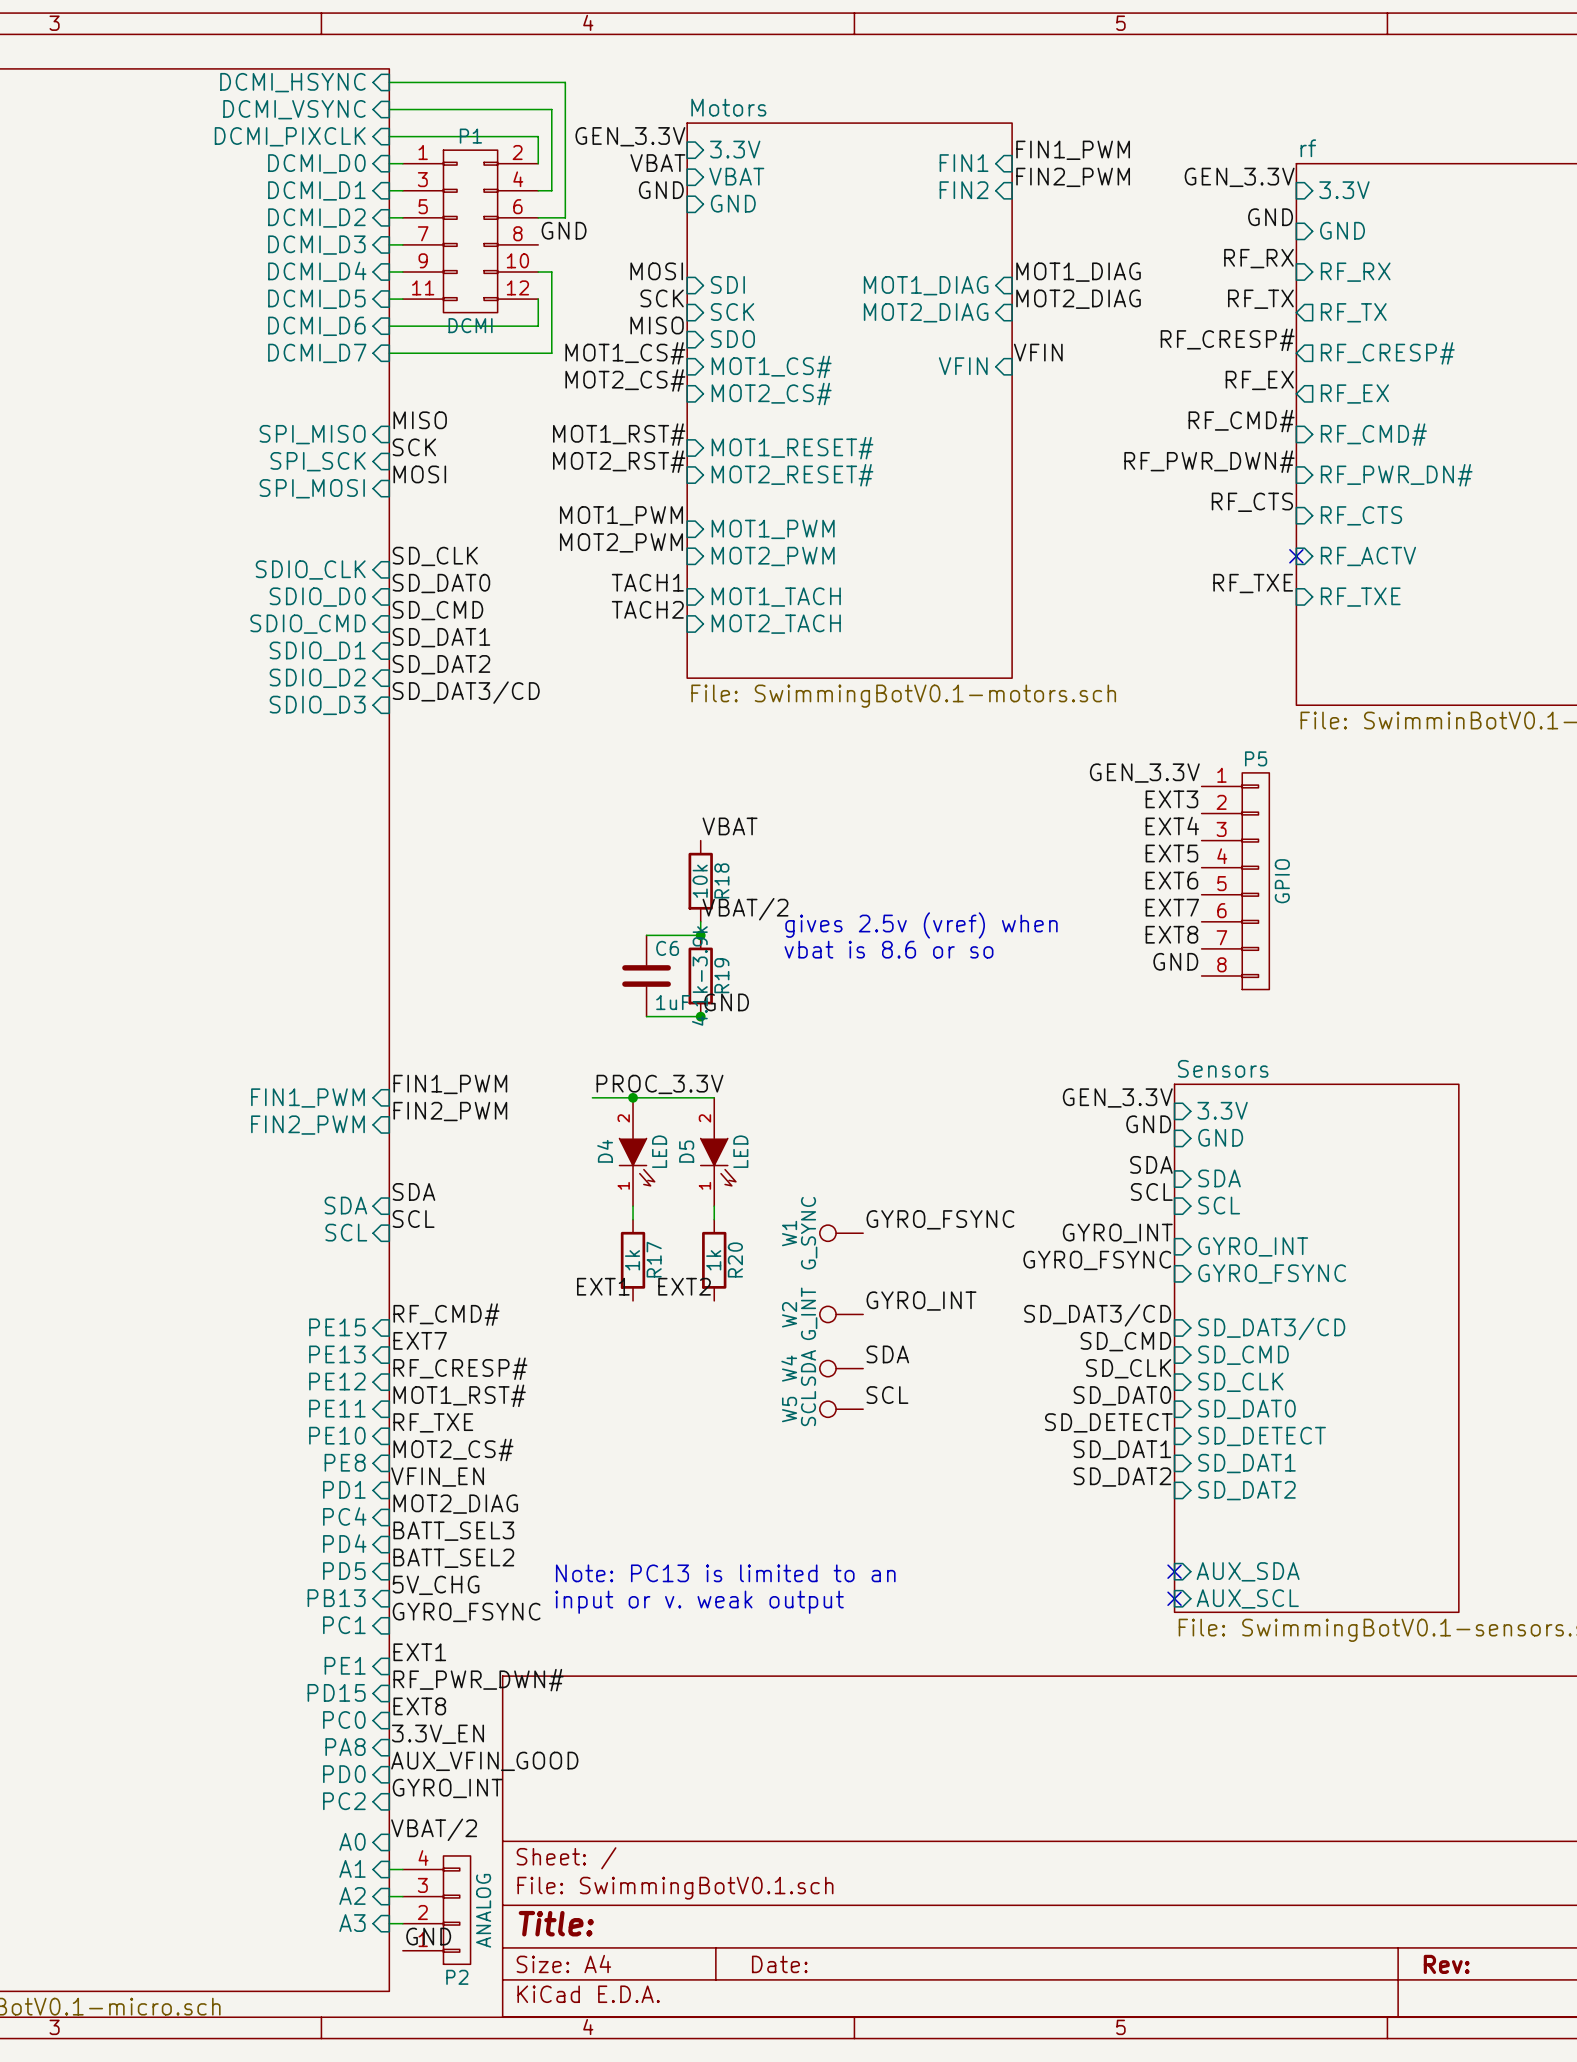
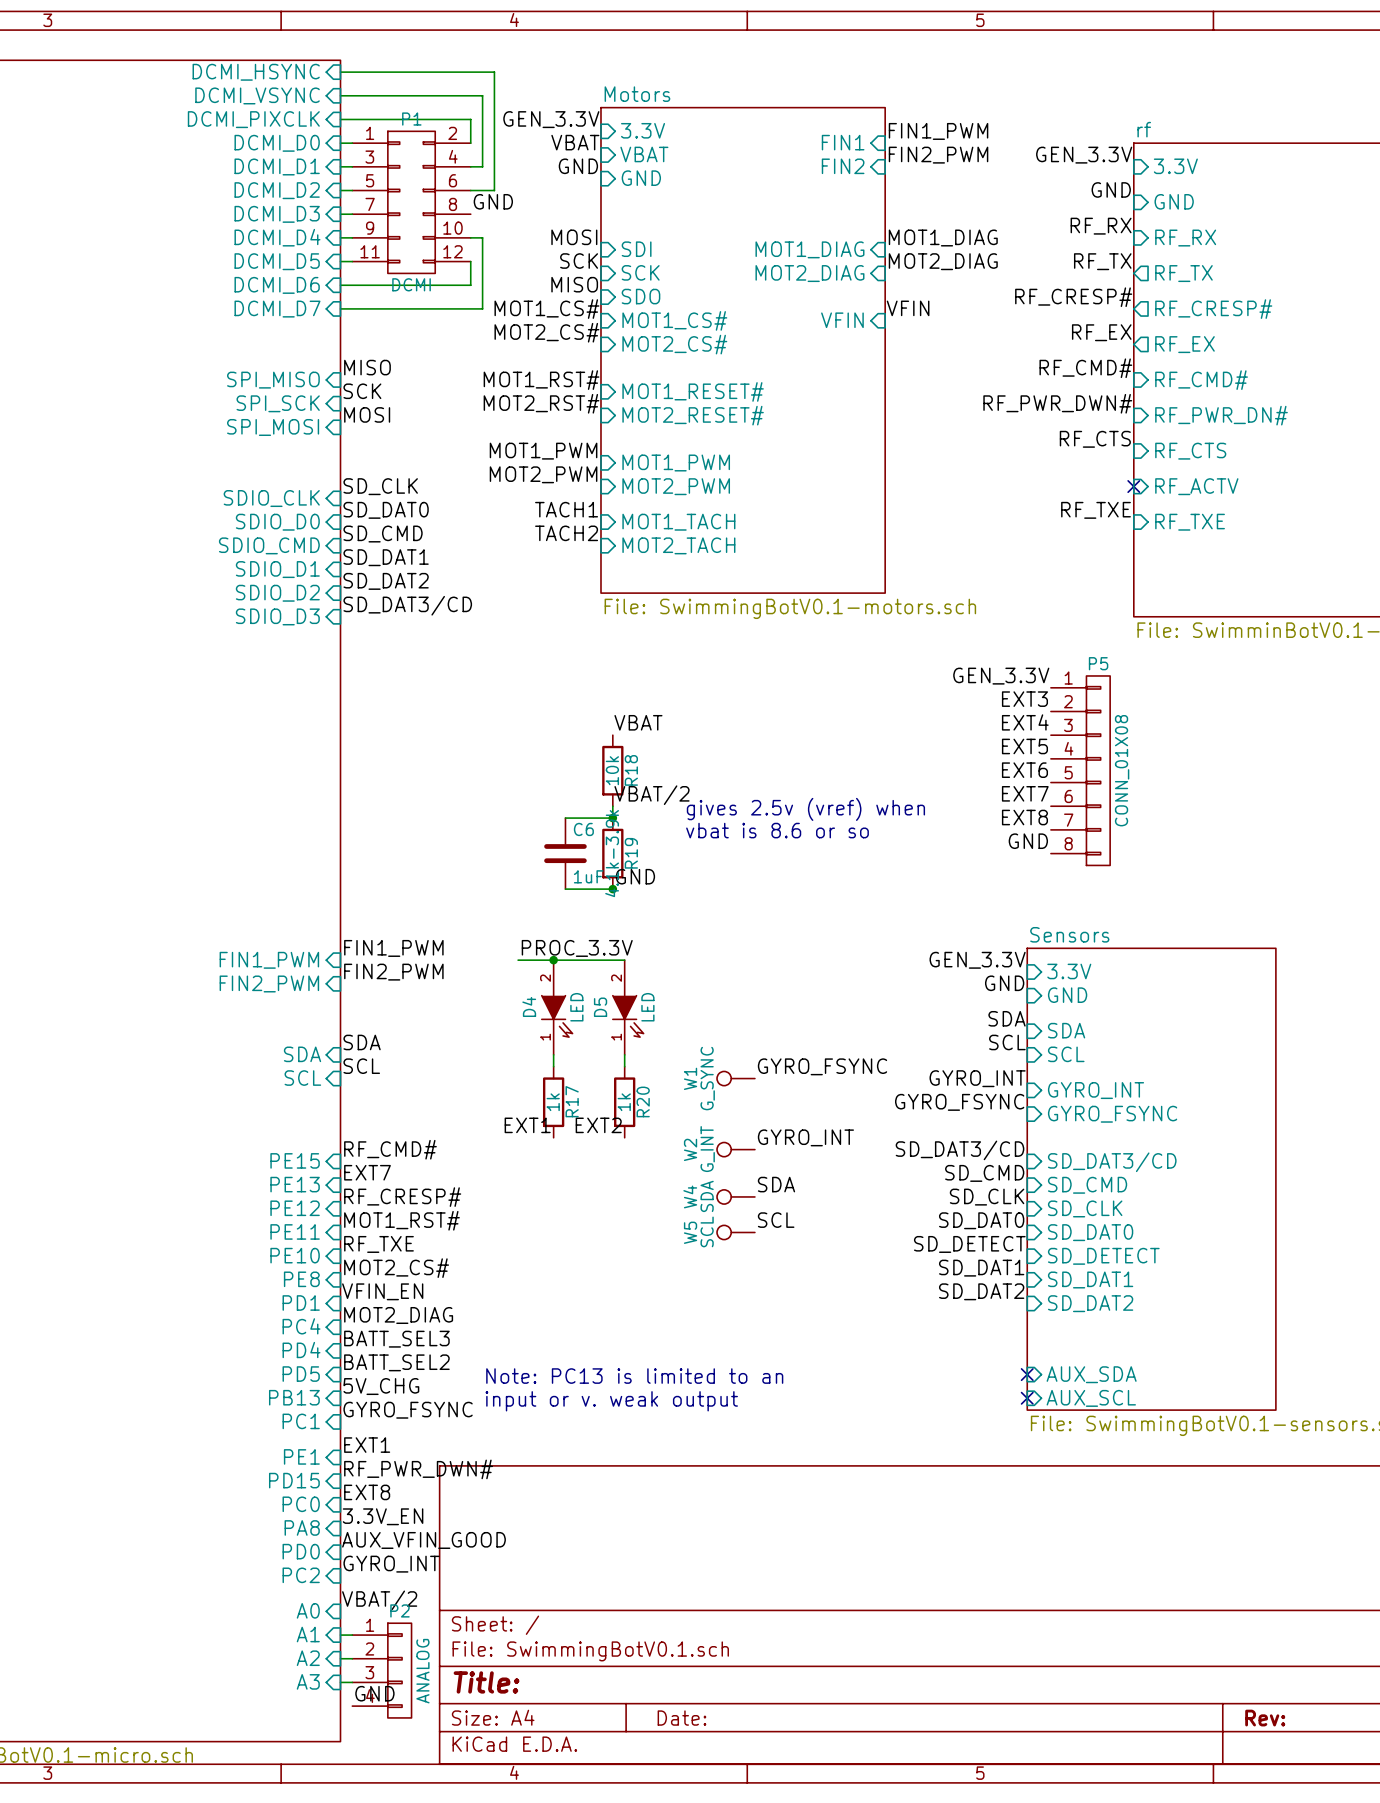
P5 value: GPIO (1282, 881) -> CONN_01X08 (1122, 770)
P2 flip: as is (457, 1910) -> up-down (399, 1670)

